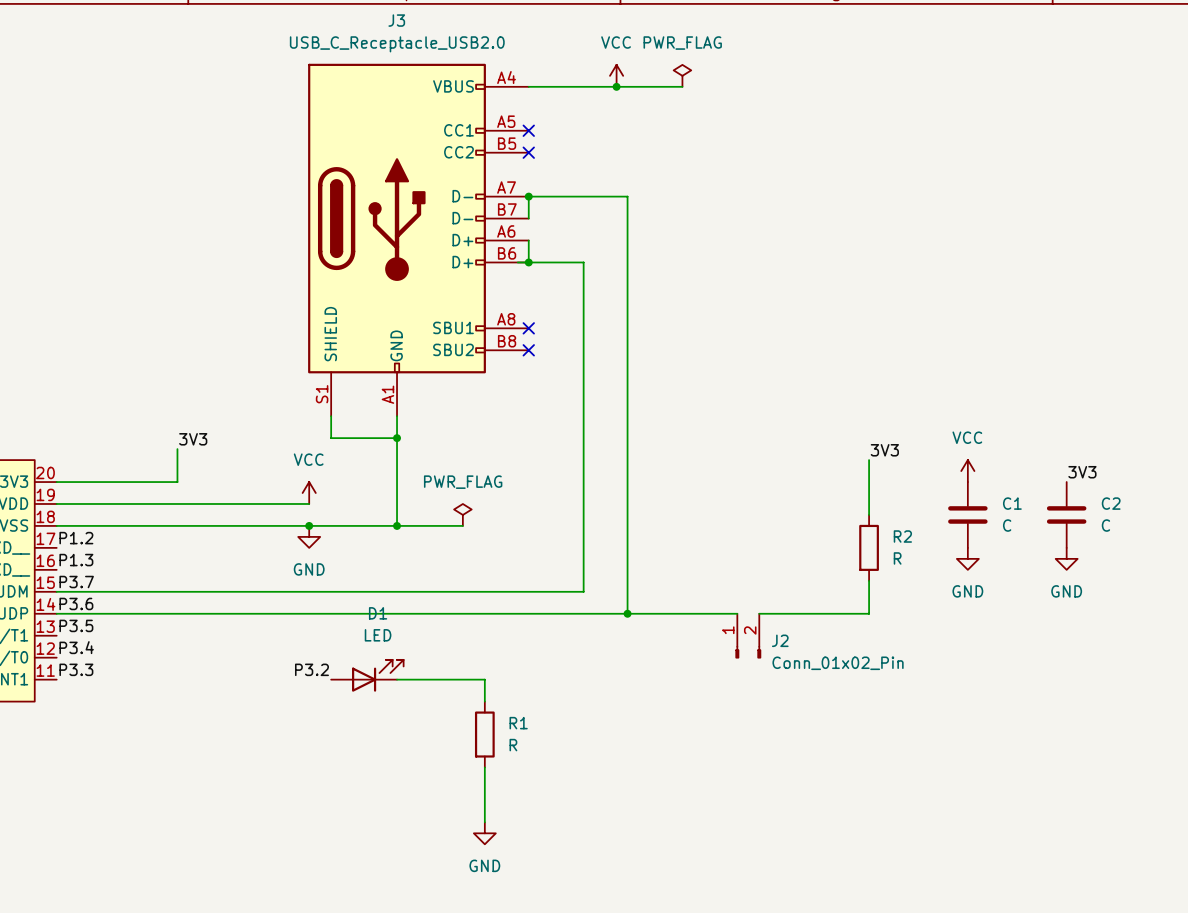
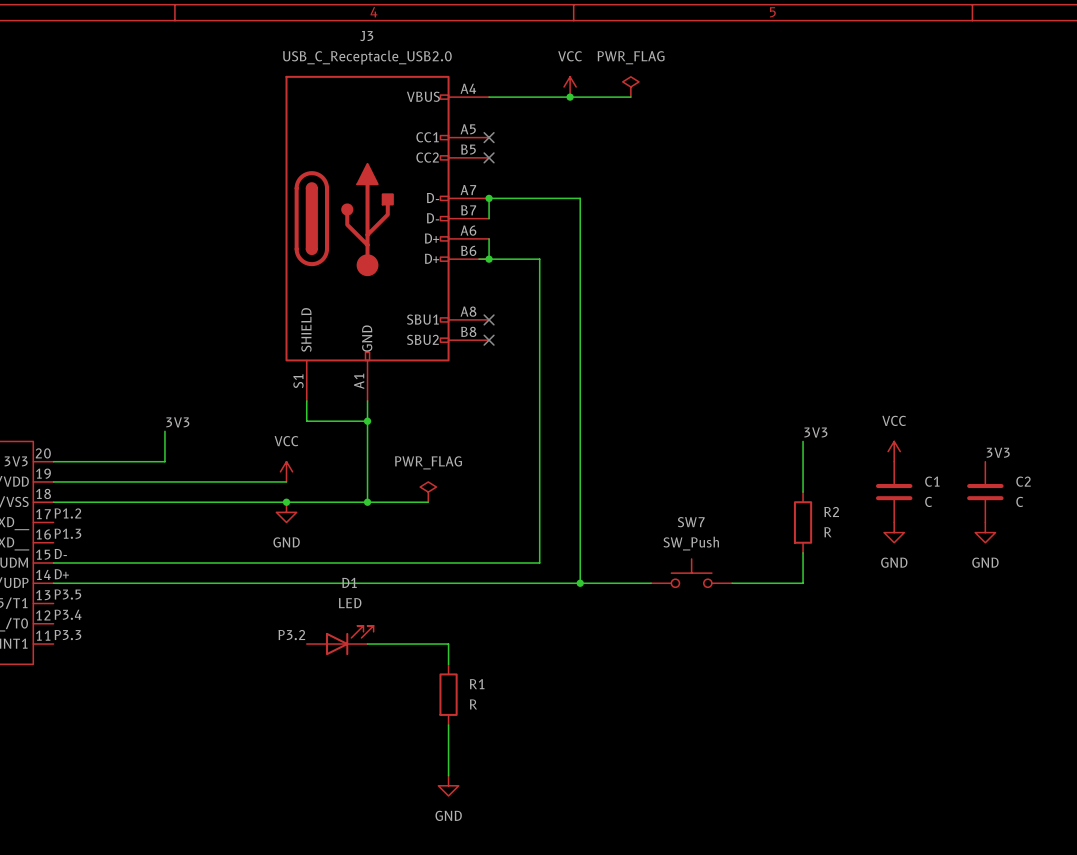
label: P3.7 (76, 582) -> D- (60, 553)
SW7: none -> SW_Push (691, 573)
label: P3.6 (76, 603) -> D+ (61, 574)
J2: Conn_01x02_Pin (748, 636) -> none

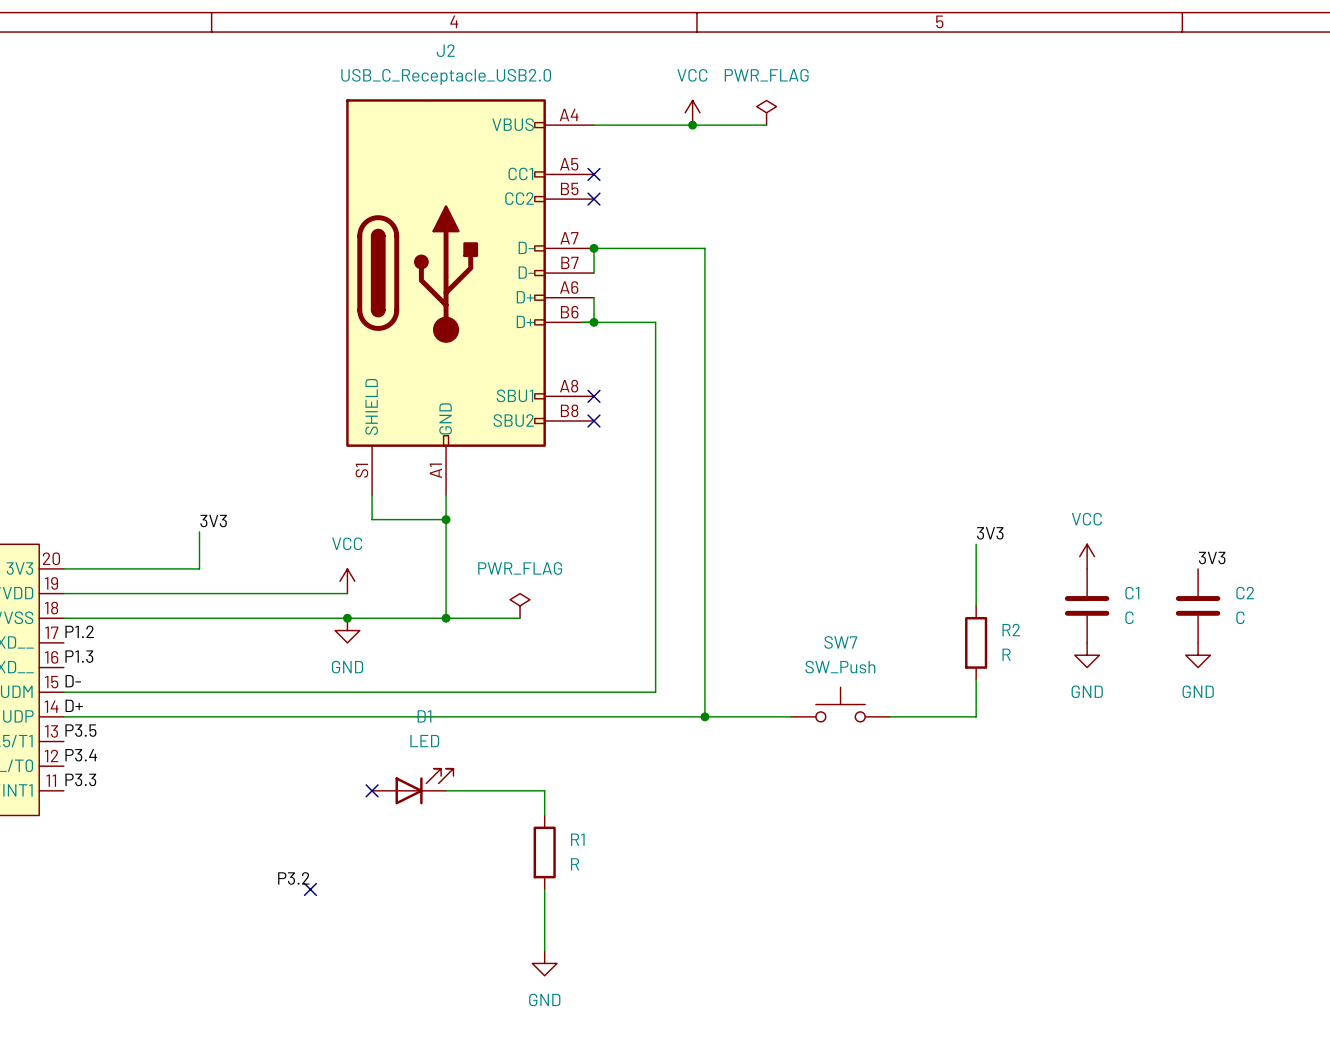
J3 name: J3 (366, 36) -> J2 (445, 50)
label position: P3.2 (291, 635) -> P3.2 (293, 878)
no-connect mark: none -> (372, 790)
no-connect mark: none -> (310, 889)

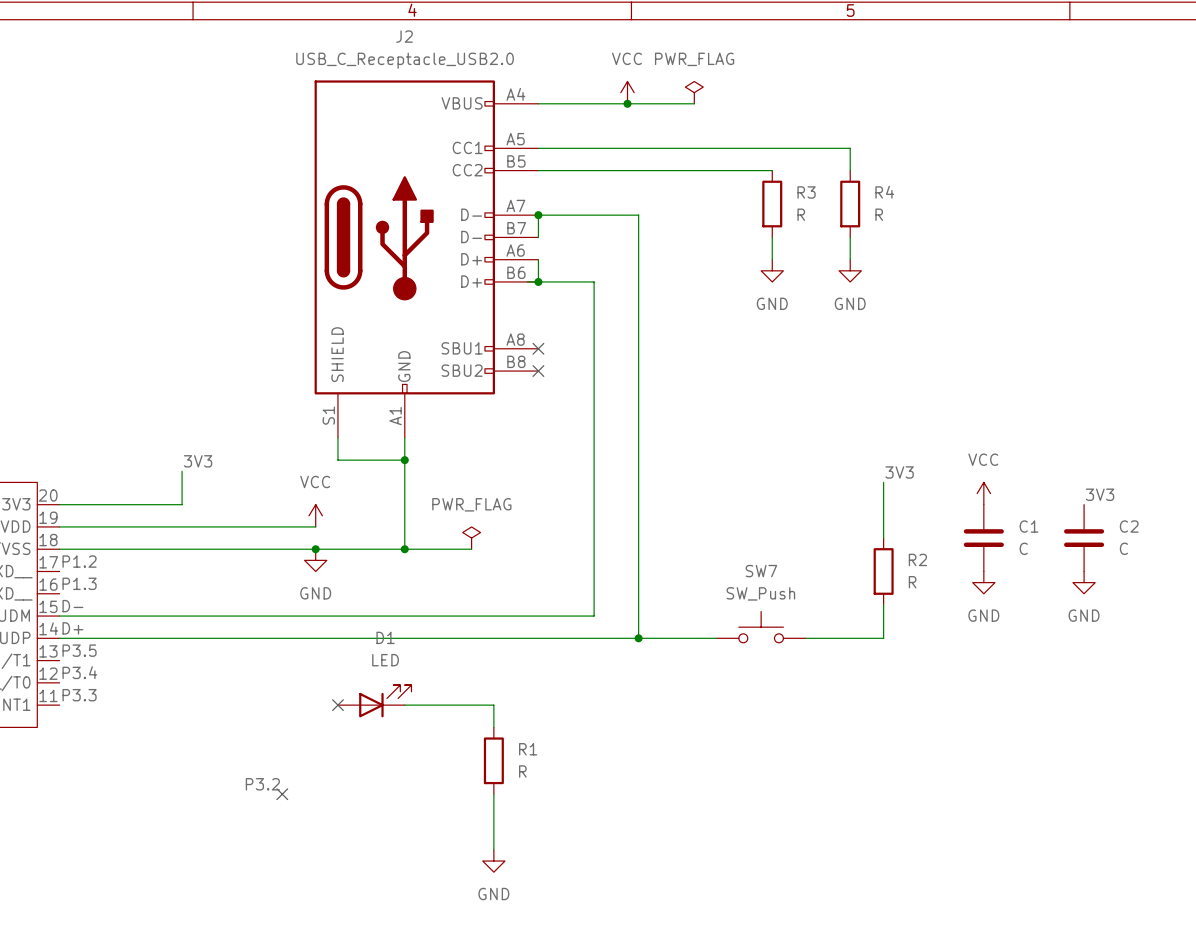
wire: none -> (538, 148) (850, 148) (850, 170)
no-connect mark: (593, 174) -> none
wire: none -> (538, 170) (772, 170)
no-connect mark: (593, 199) -> none
R3: none -> R (772, 204)
R4: none -> R (850, 204)
wire: none -> (772, 237) (772, 259)
wire: none -> (850, 237) (850, 259)
power symbol: none -> GND (772, 270)
power symbol: none -> GND (850, 270)

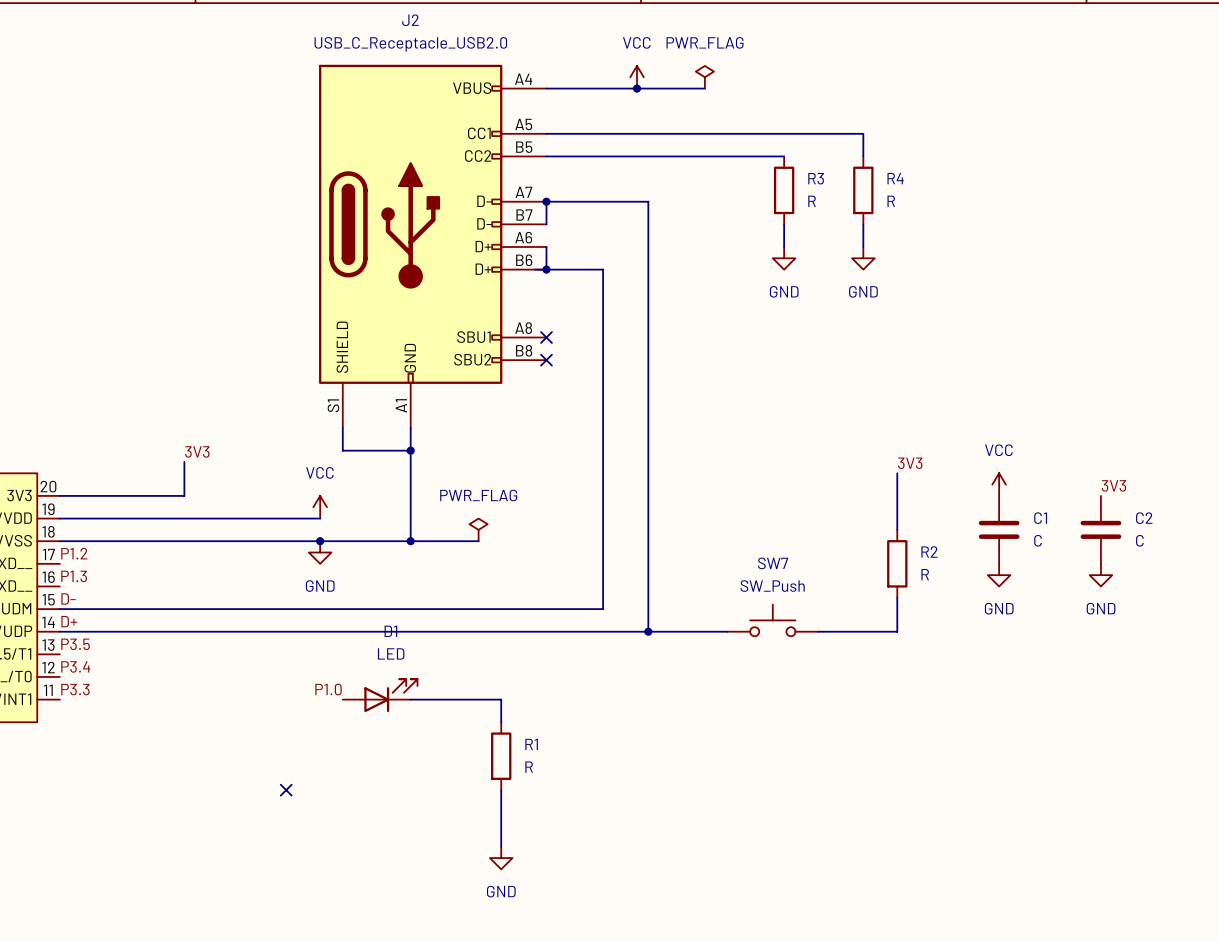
label: none -> P1.0 (328, 689)
no-connect mark: (337, 705) -> none
label: P3.2 (262, 784) -> none

